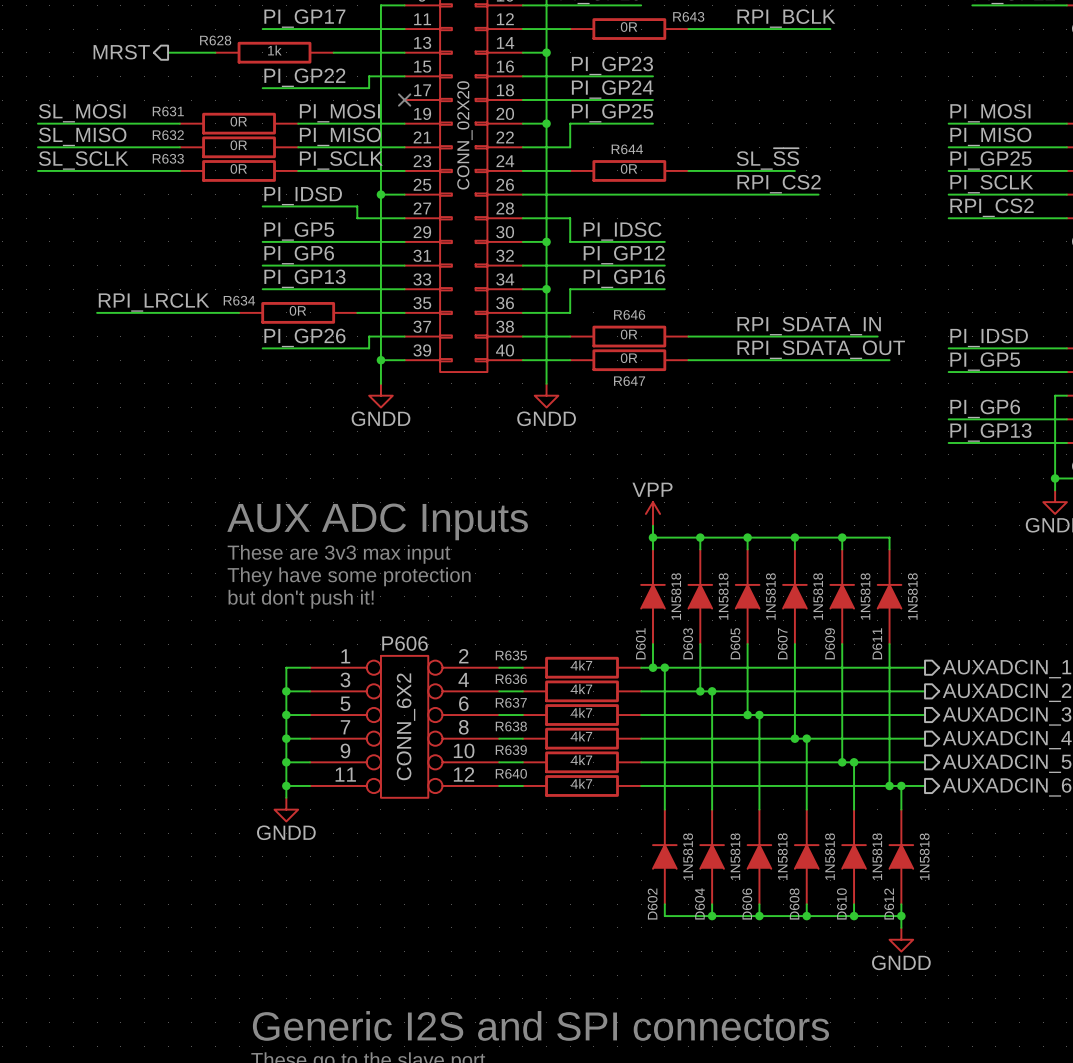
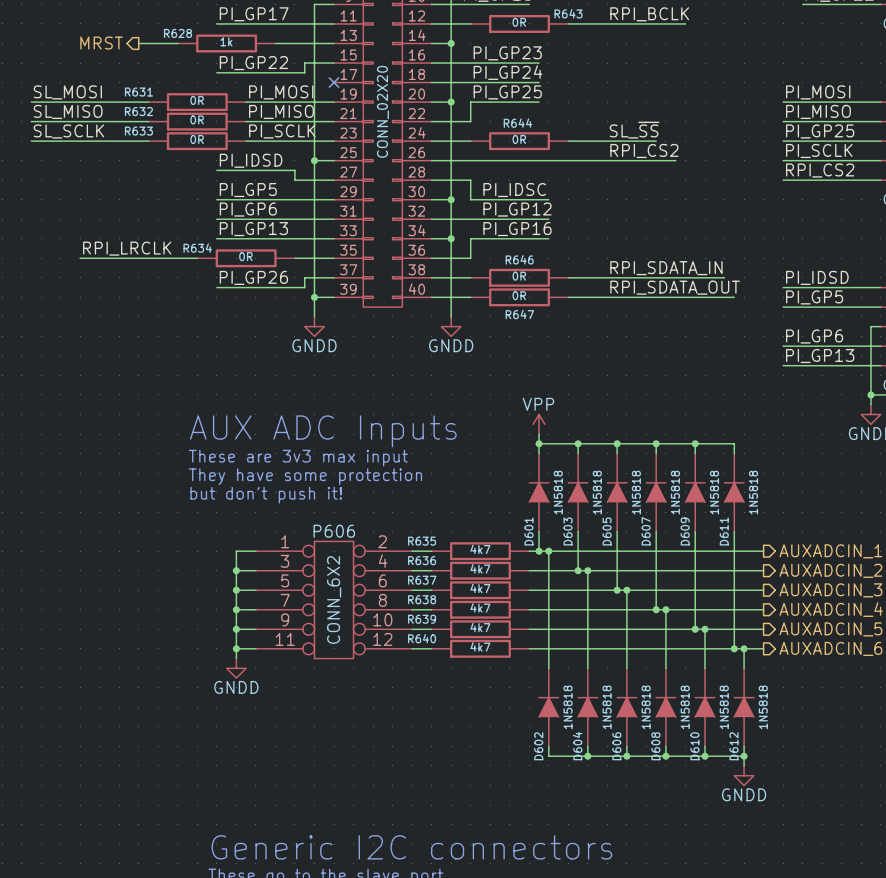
text: Generic I2S and SPI connectors (540, 1025) -> Generic I2C connectors (411, 847)

